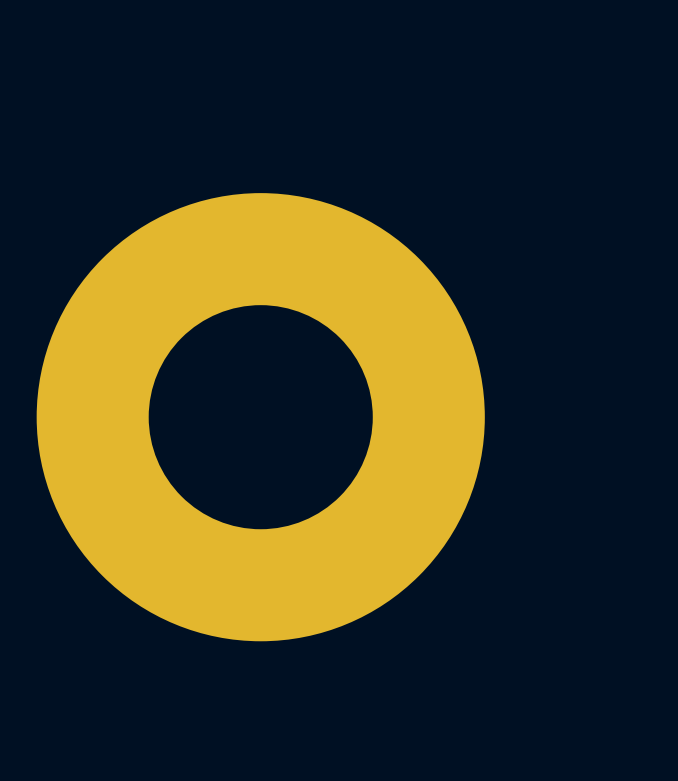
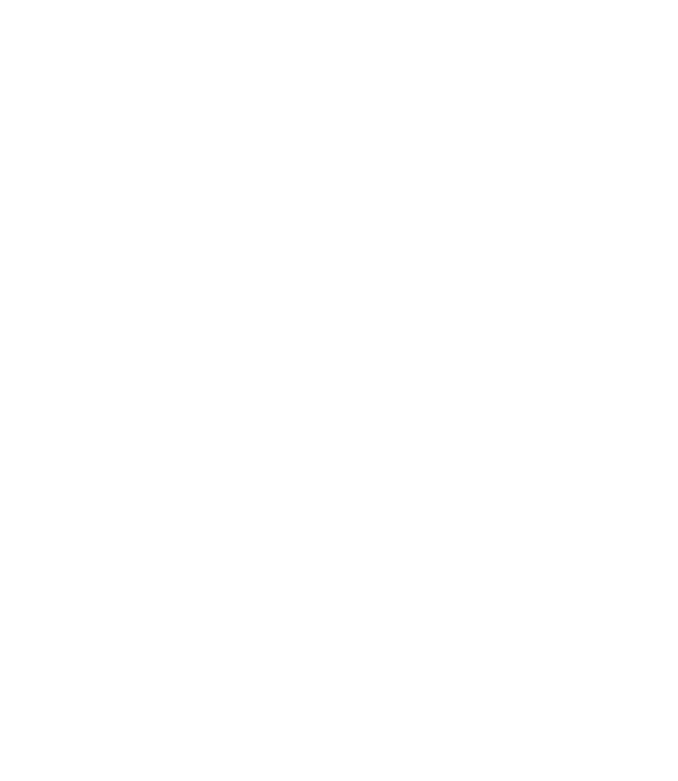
part: (260, 417) -> none

